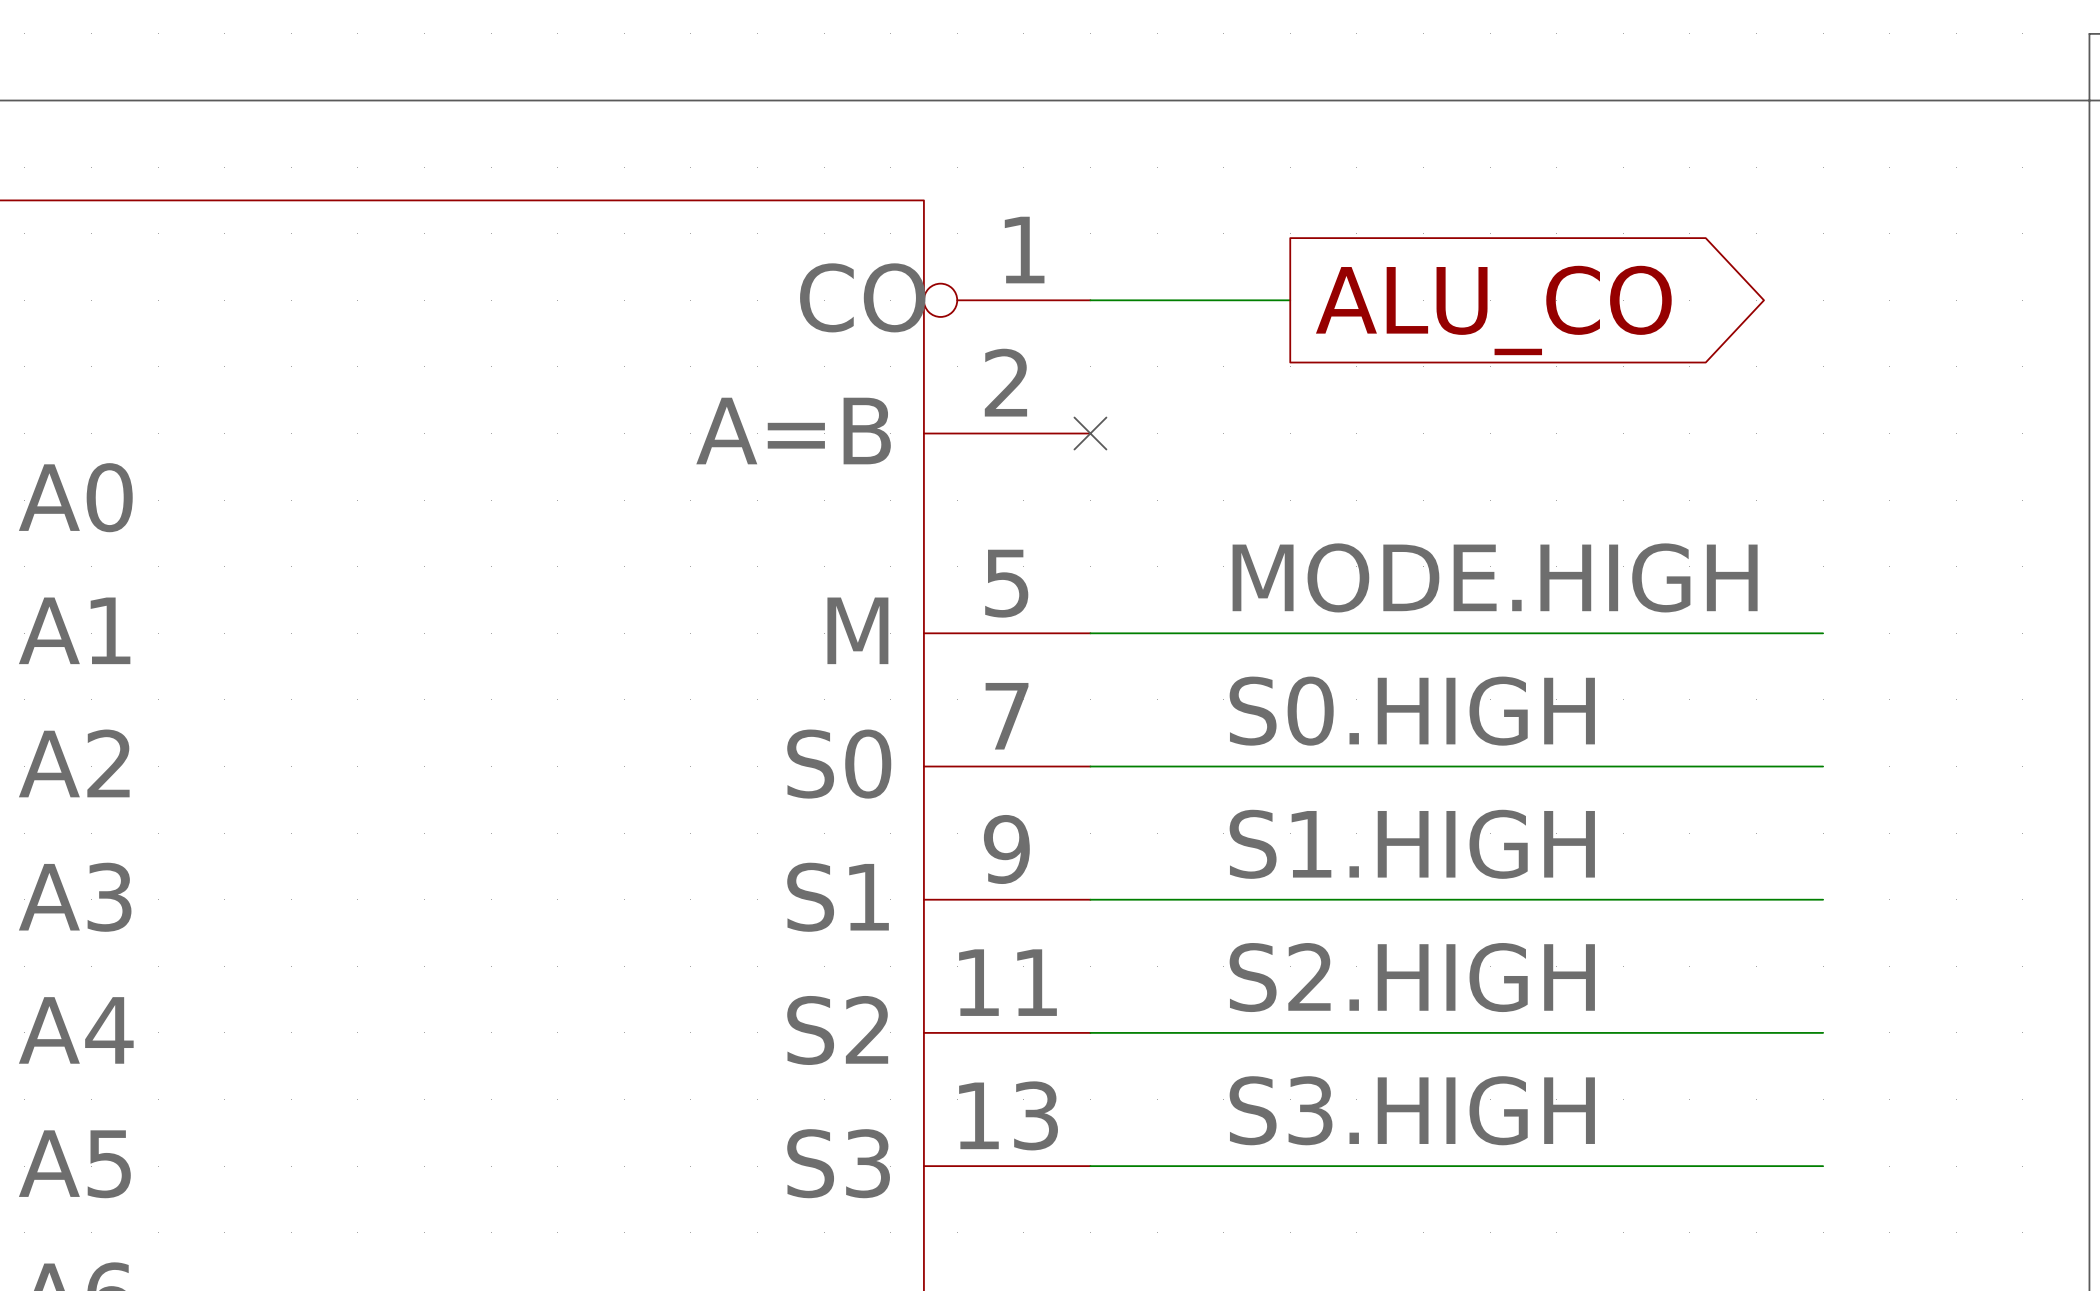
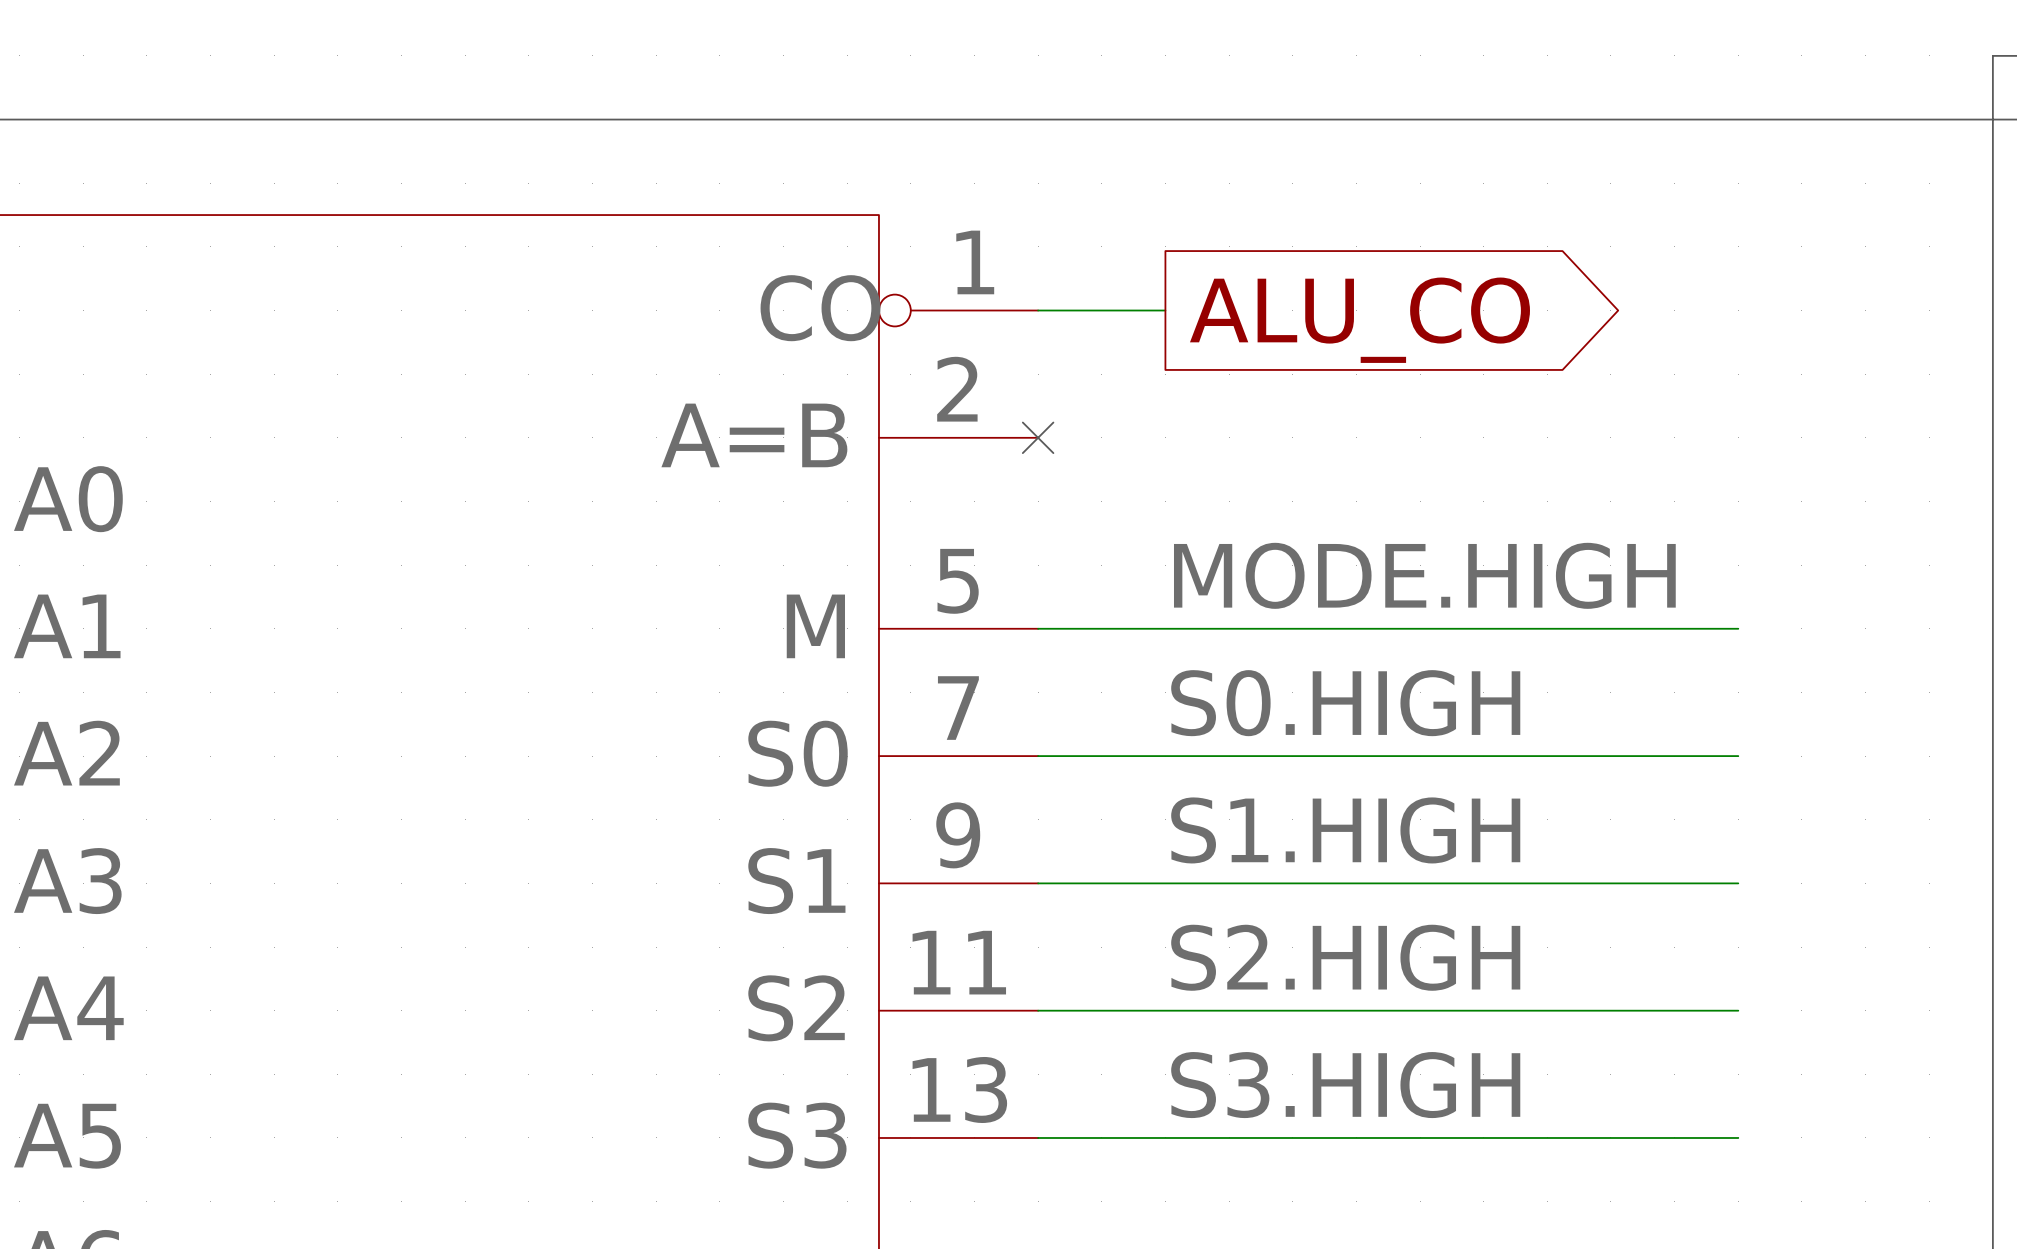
wire: (1223, 300) (1290, 300) -> none
global label position: ALU_CO (1493, 310) -> ALU_CO (1359, 320)

